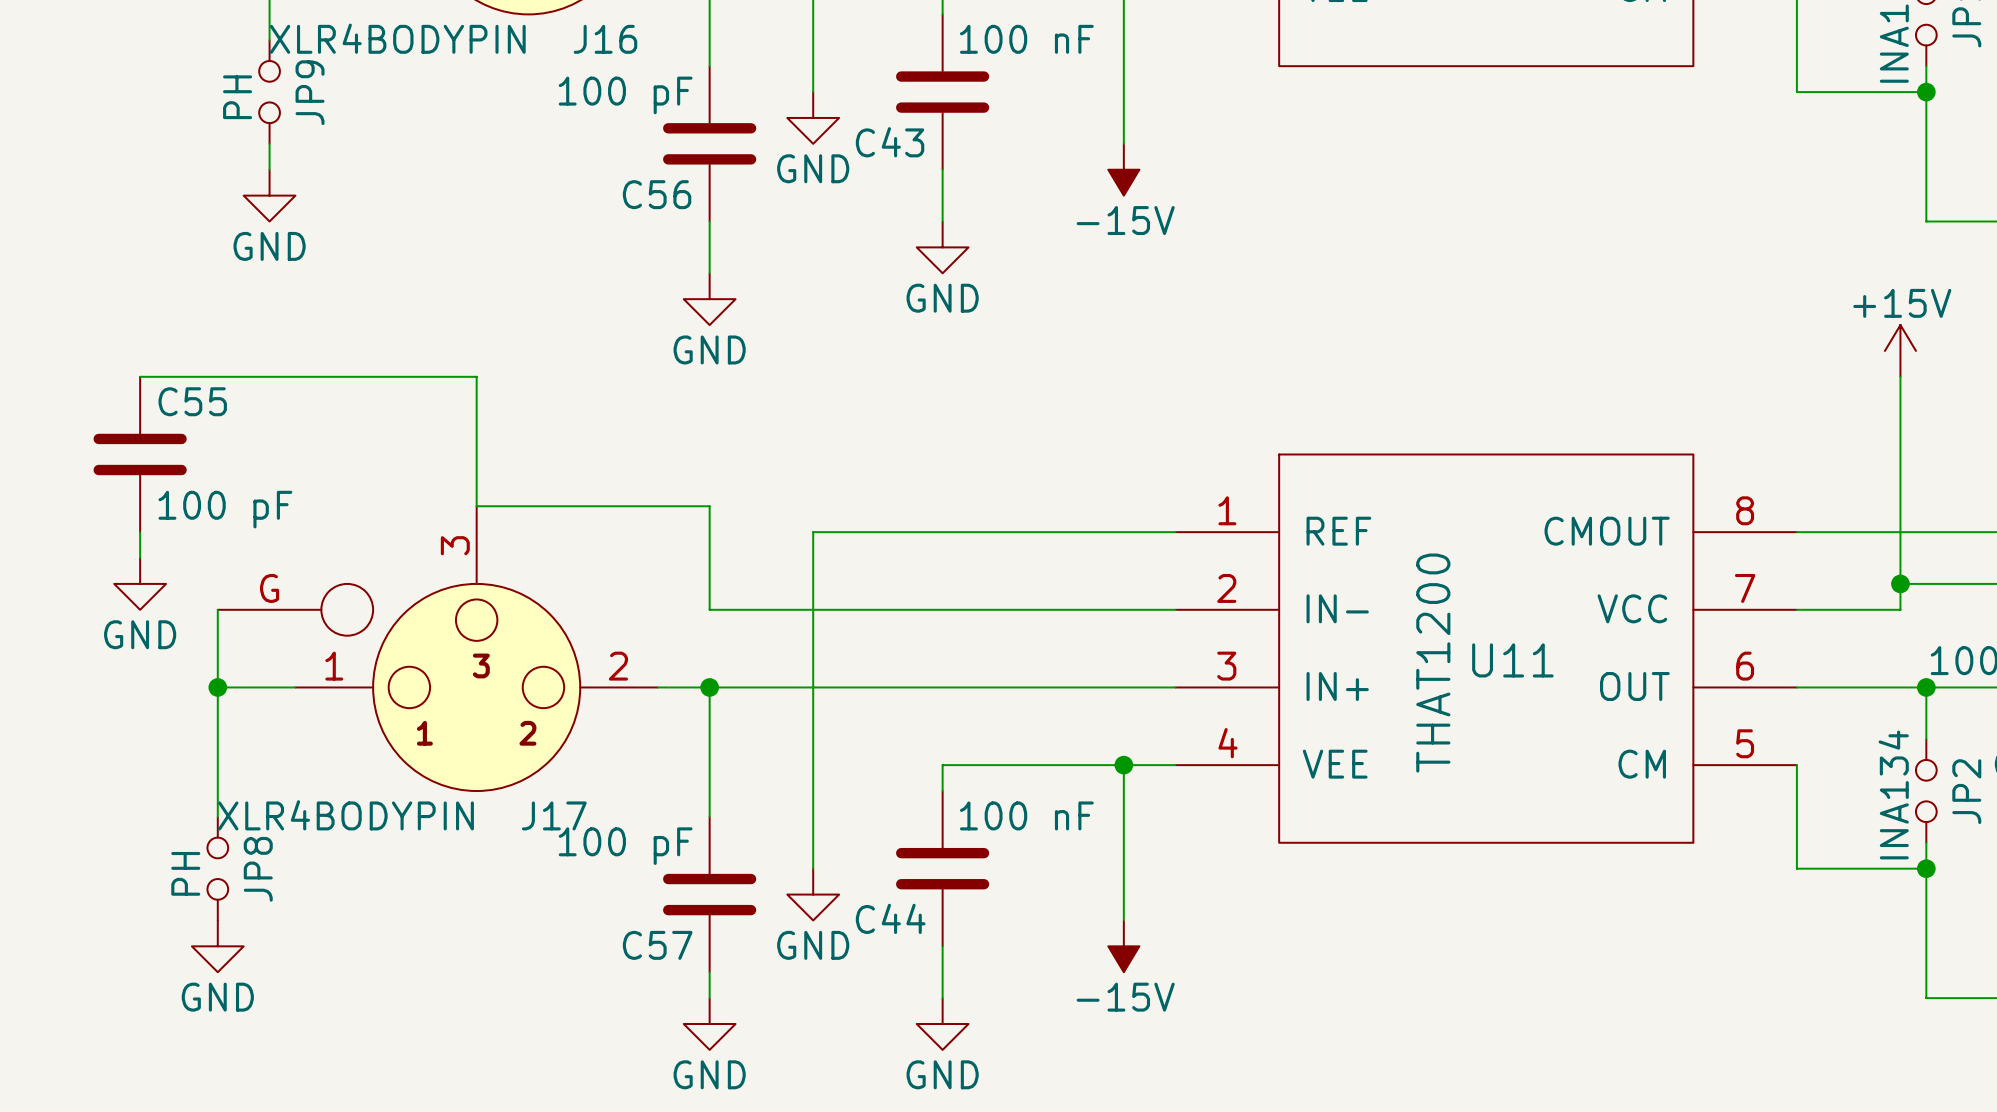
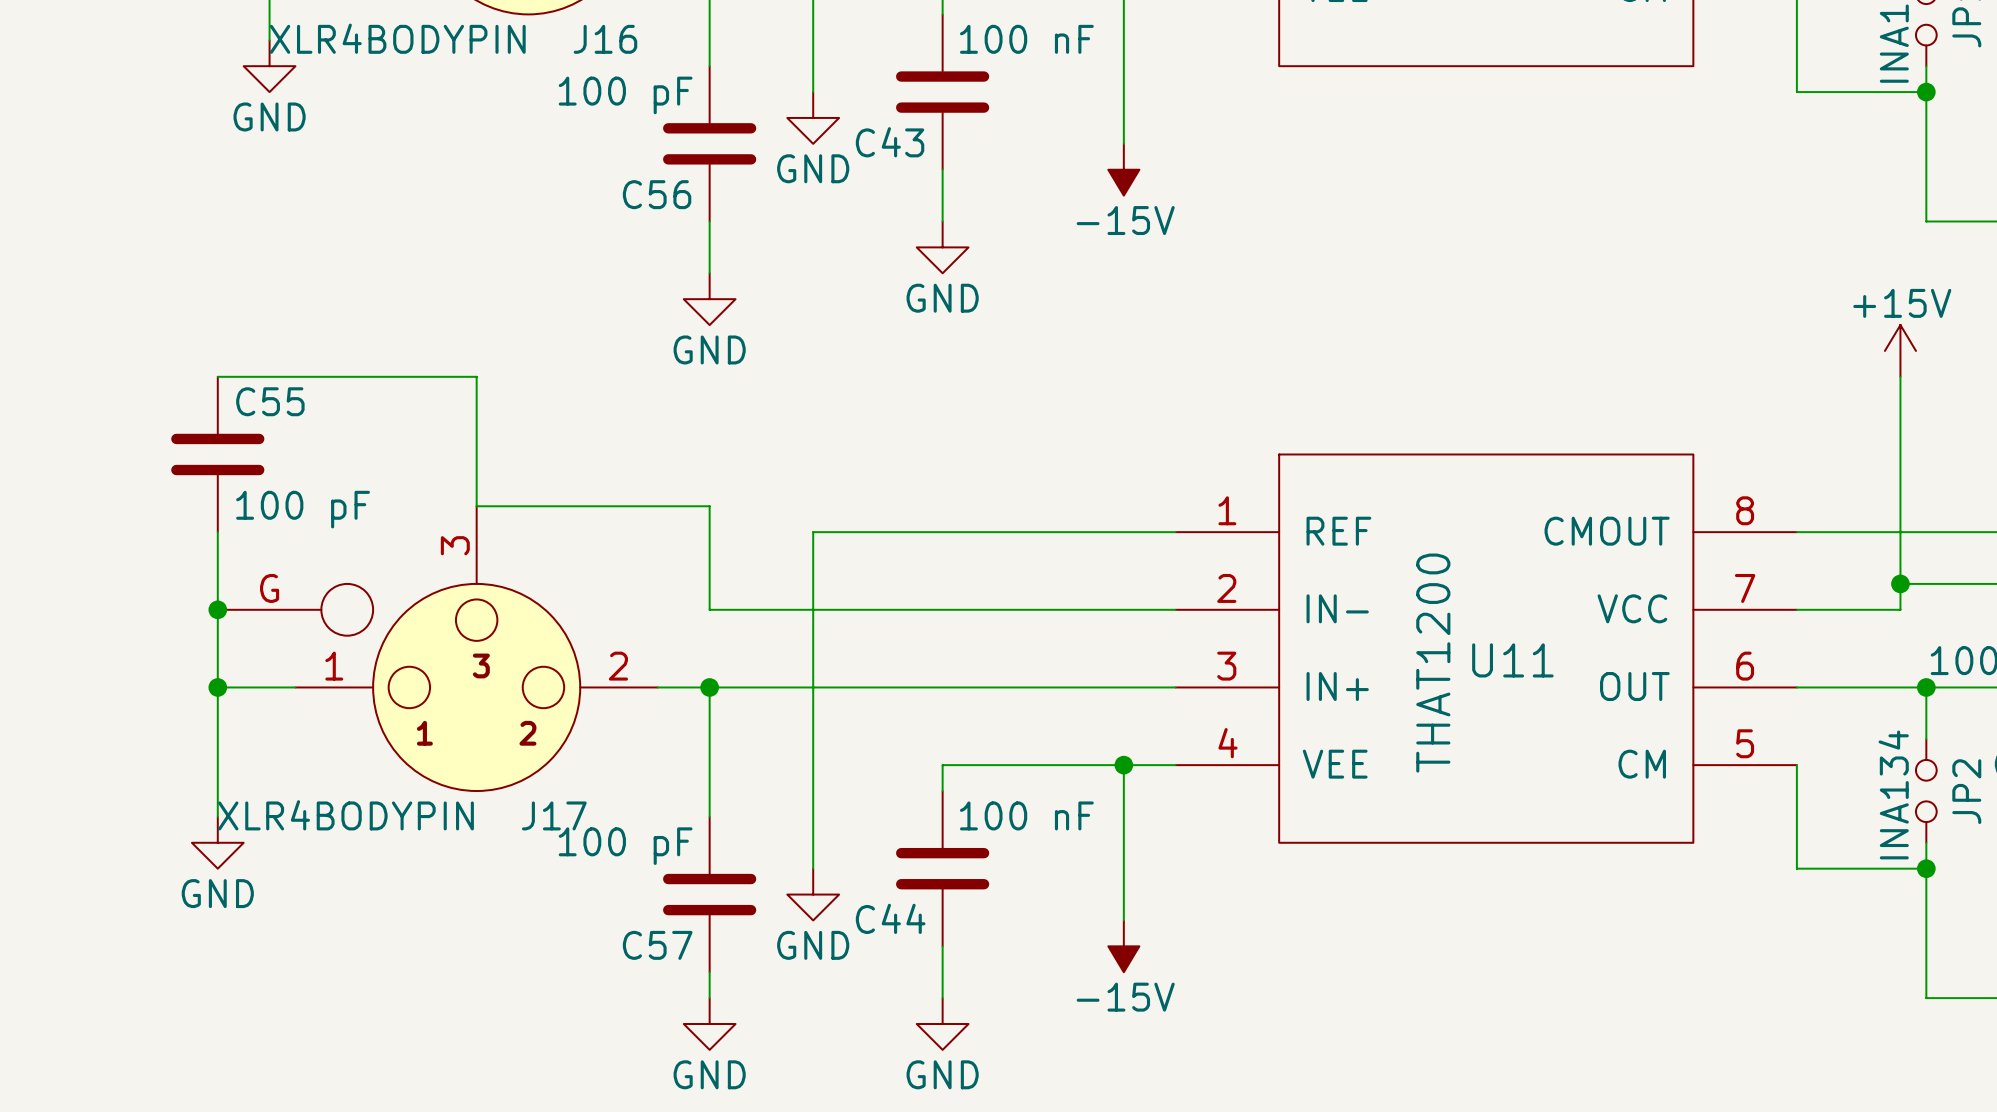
JP9: PH (269, 92) -> none
wire: (269, 143) (269, 169) -> none
power symbol position: GND (269, 195) -> GND (269, 66)
wire: (140, 376) (217, 376) -> none
C55 position: (140, 454) -> (217, 454)
wire: (140, 532) (140, 558) -> none
wire: none -> (217, 532) (217, 609)
power symbol: GND (140, 583) -> none
junction: none -> (217, 609)
JP8: PH (217, 868) -> none
power symbol position: GND (217, 946) -> GND (217, 842)

